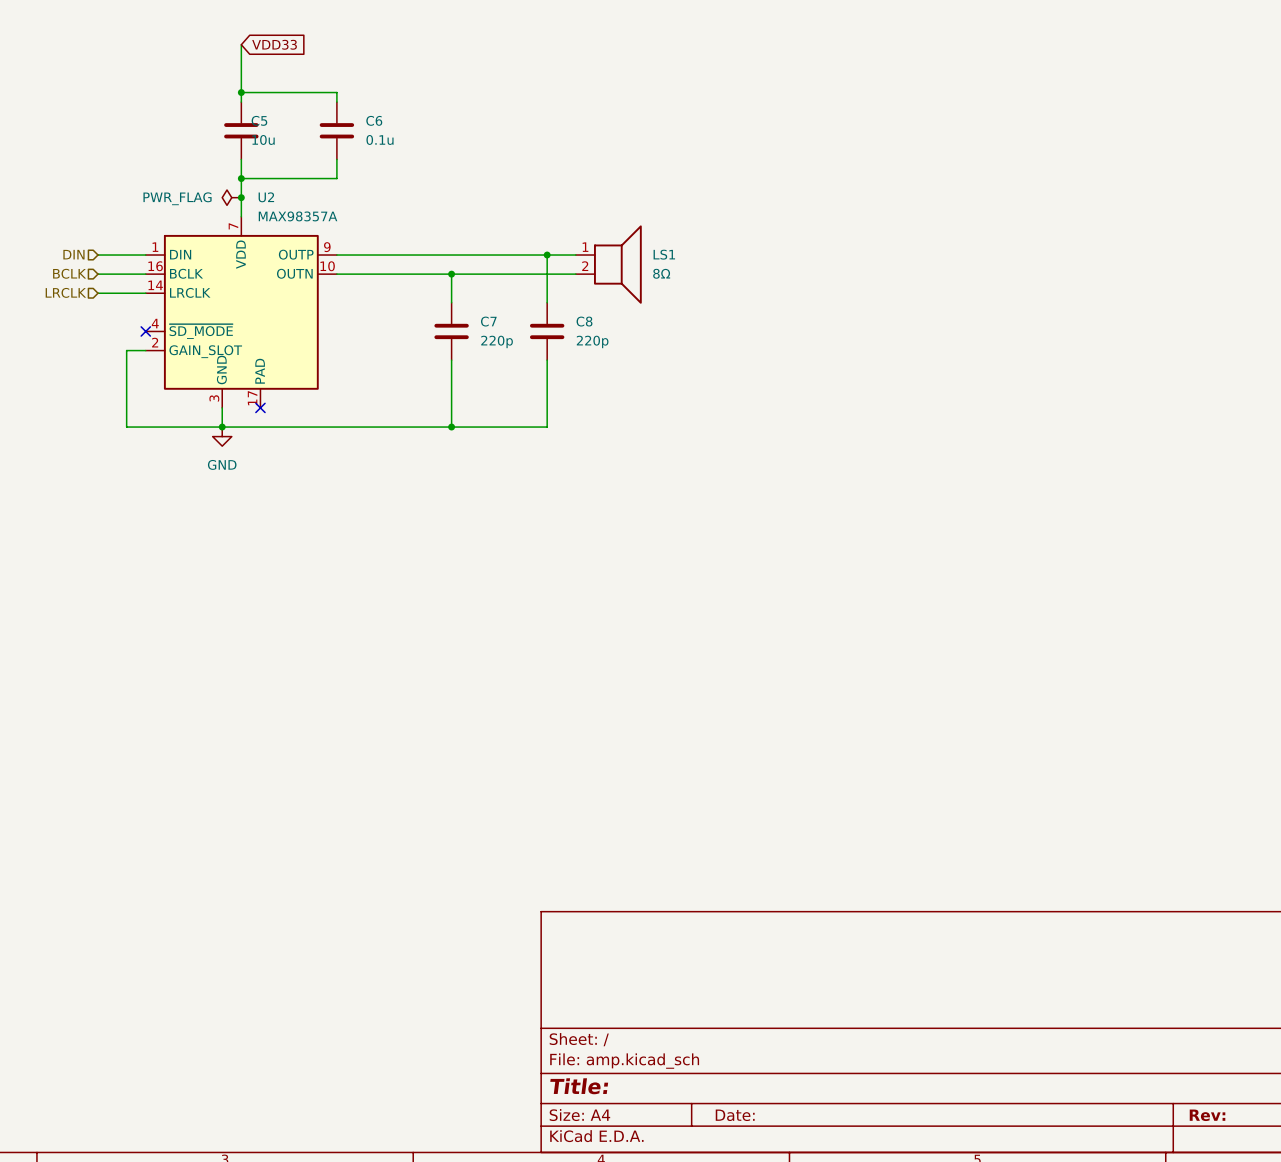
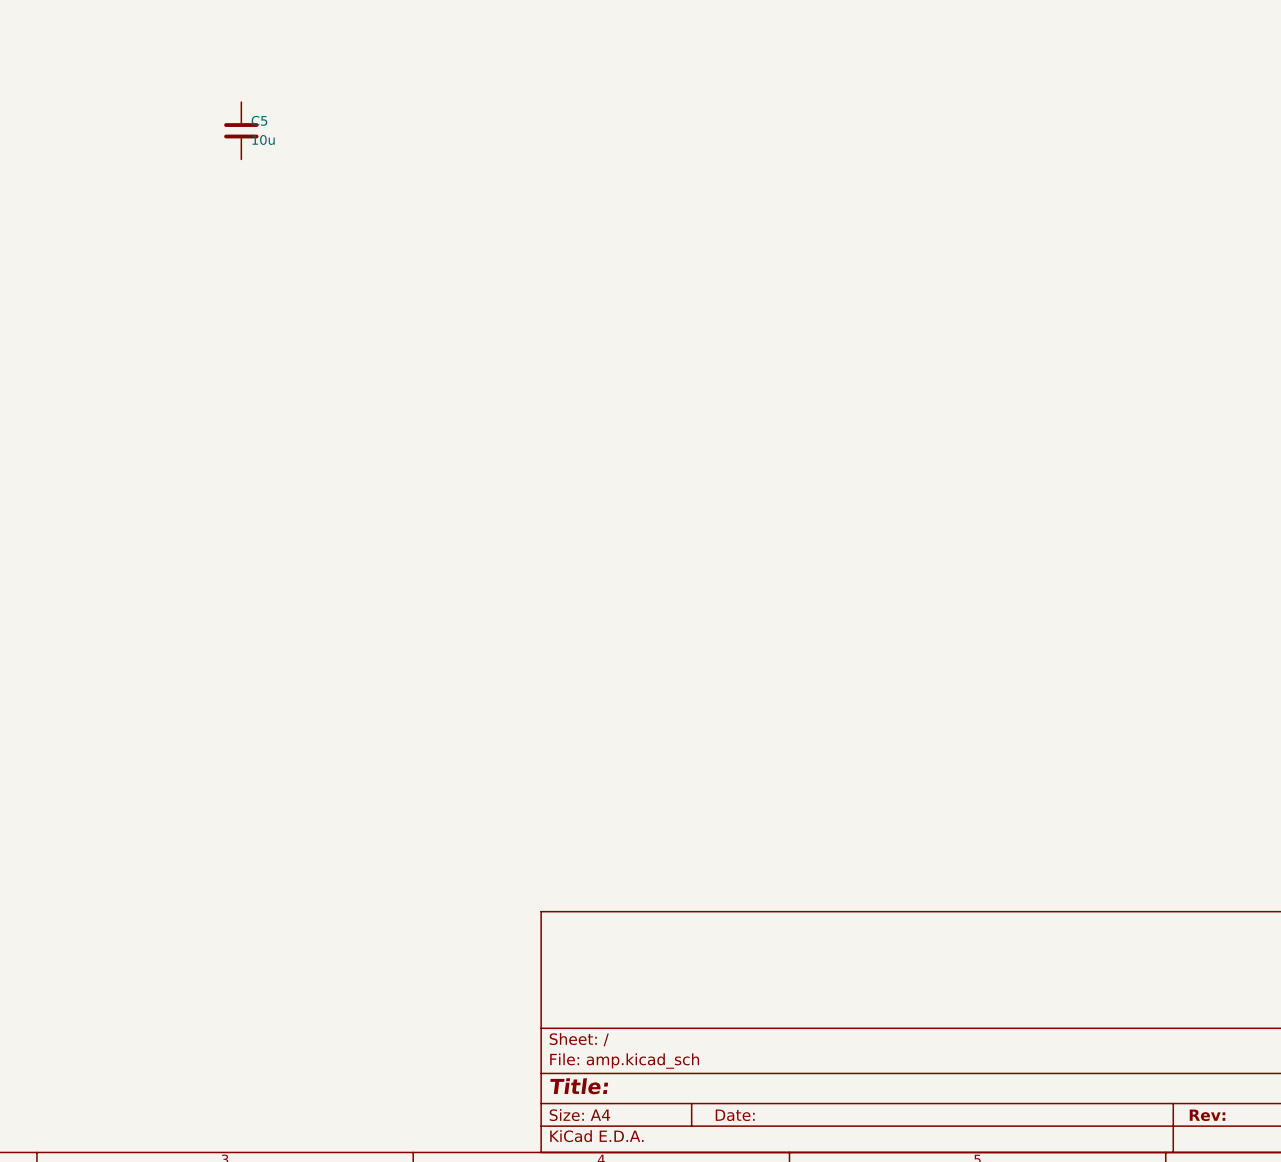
wire: (241, 44) (241, 102) -> none
global label: VDD33 (274, 44) -> none
wire: (241, 92) (336, 92) (336, 102) -> none
junction: (241, 92) -> none
C6: 0.1u (336, 130) -> none
wire: (241, 159) (241, 216) -> none
wire: (336, 159) (336, 178) (241, 178) -> none
junction: (241, 178) -> none
power symbol: PWR_FLAG (231, 197) -> none
junction: (241, 197) -> none
hierarchical label: DIN (73, 254) -> none
wire: (97, 255) (145, 255) -> none
wire: (336, 255) (575, 255) -> none
wire: (547, 255) (547, 302) -> none
junction: (547, 255) -> none
LS1: 8Ω (608, 264) -> none
hierarchical label: BCLK (69, 273) -> none
wire: (97, 274) (145, 274) -> none
wire: (336, 274) (575, 274) -> none
wire: (451, 274) (451, 302) -> none
junction: (451, 274) -> none
hierarchical label: LRCLK (65, 292) -> none
wire: (97, 293) (145, 293) -> none
U2: MAX98357A (241, 312) -> none
no-connect mark: (145, 331) -> none
C7: 220p (451, 331) -> none
C8: 220p (547, 331) -> none
wire: (145, 350) (126, 350) (126, 427) (547, 427) (547, 360) -> none
wire: (451, 360) (451, 427) -> none
wire: (222, 407) (222, 427) -> none
no-connect mark: (260, 407) -> none
junction: (222, 427) -> none
junction: (451, 427) -> none
power symbol: GND (222, 436) -> none

